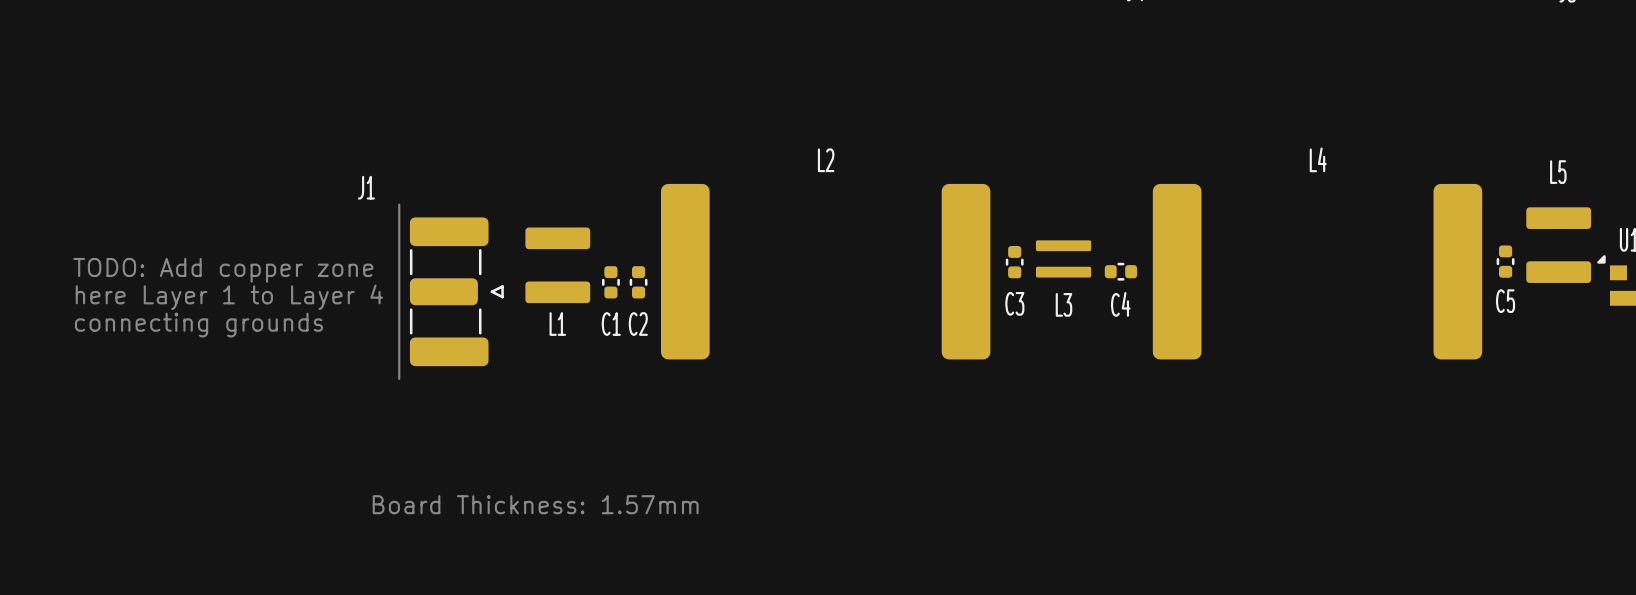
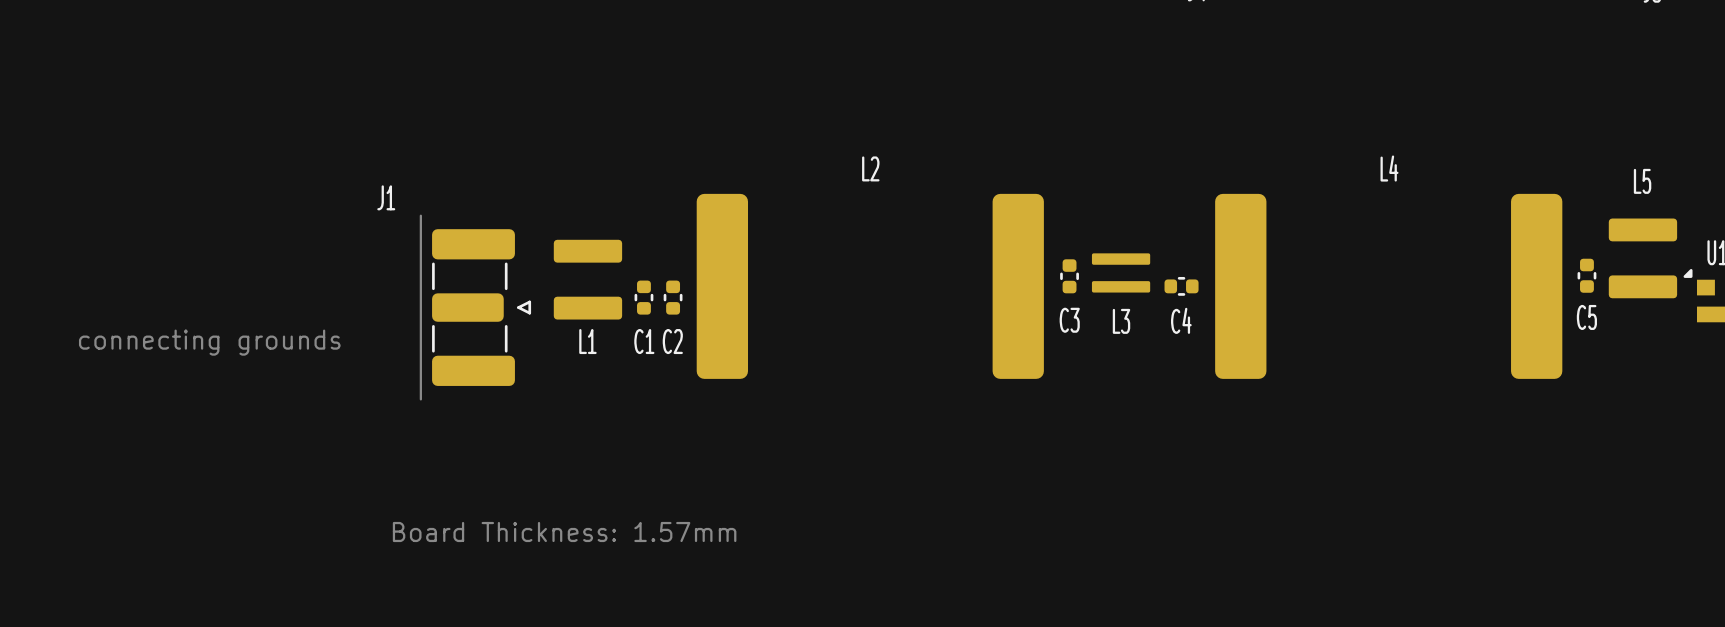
text: TODO: Add copper zone (223, 270) -> none
text: here Layer 1 to Layer 4 (229, 297) -> none

